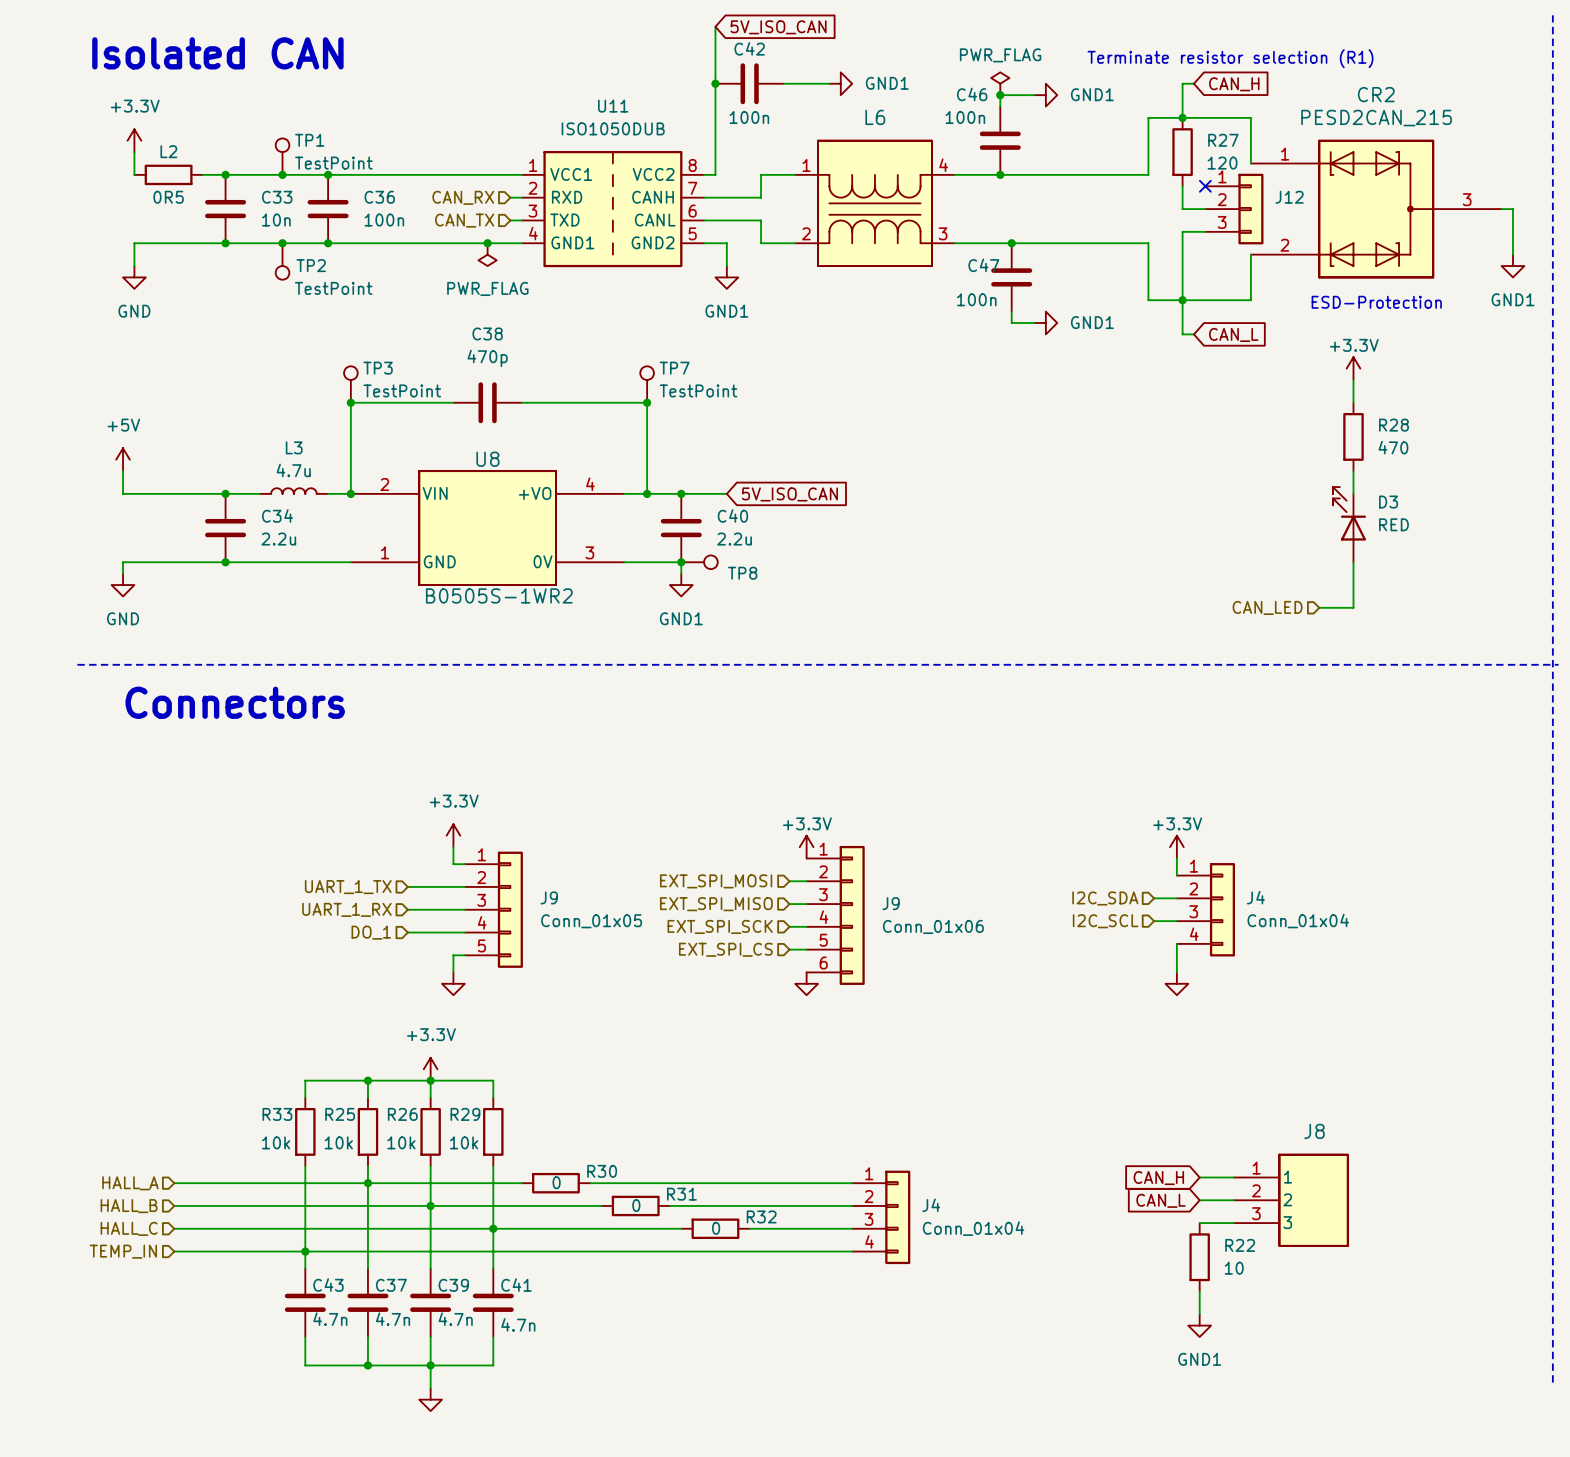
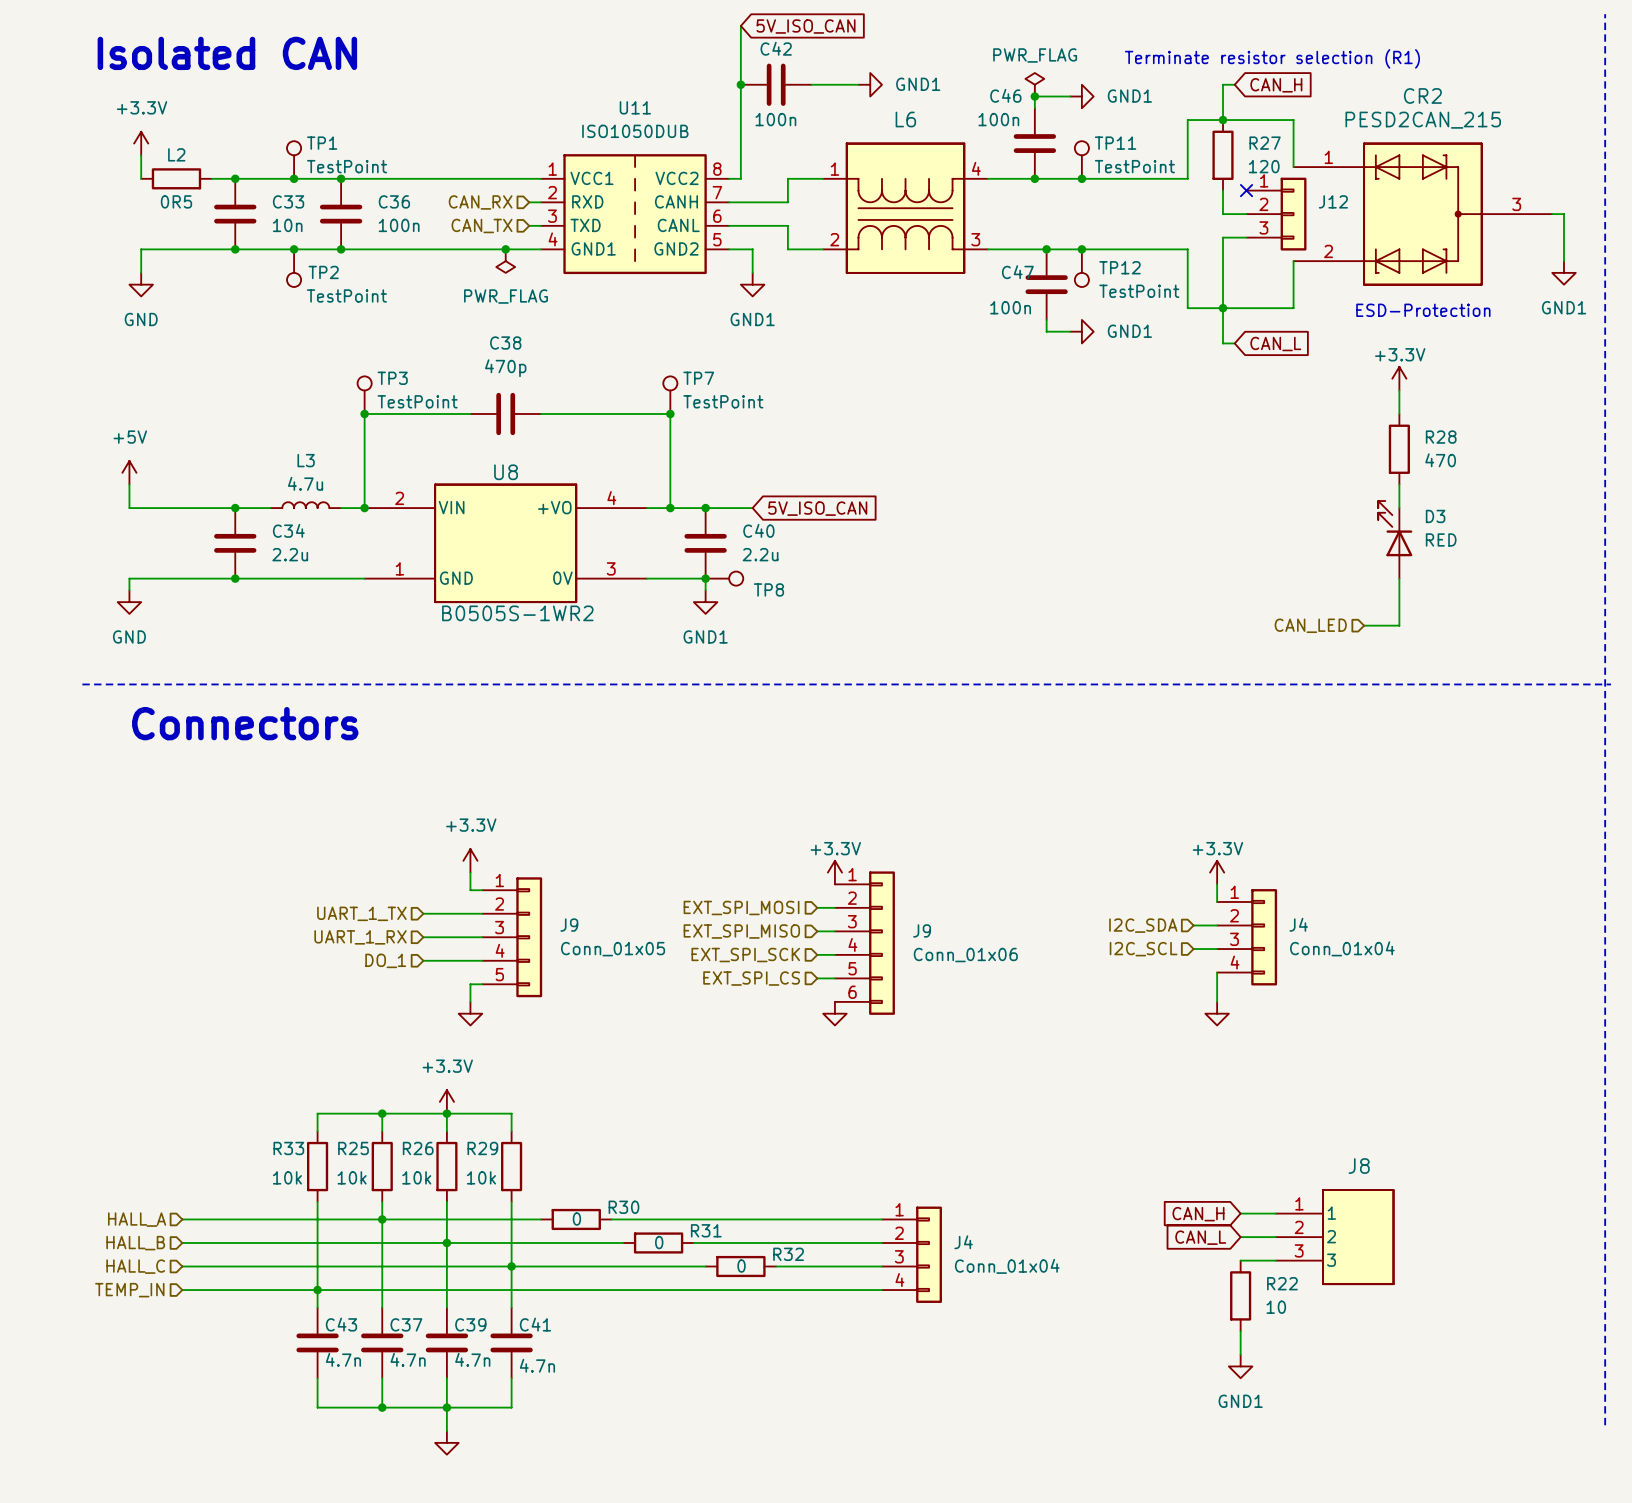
TP11: none -> TestPoint (1081, 160)
junction: none -> (1081, 178)
junction: none -> (1081, 249)
TP12: none -> TestPoint (1081, 268)

